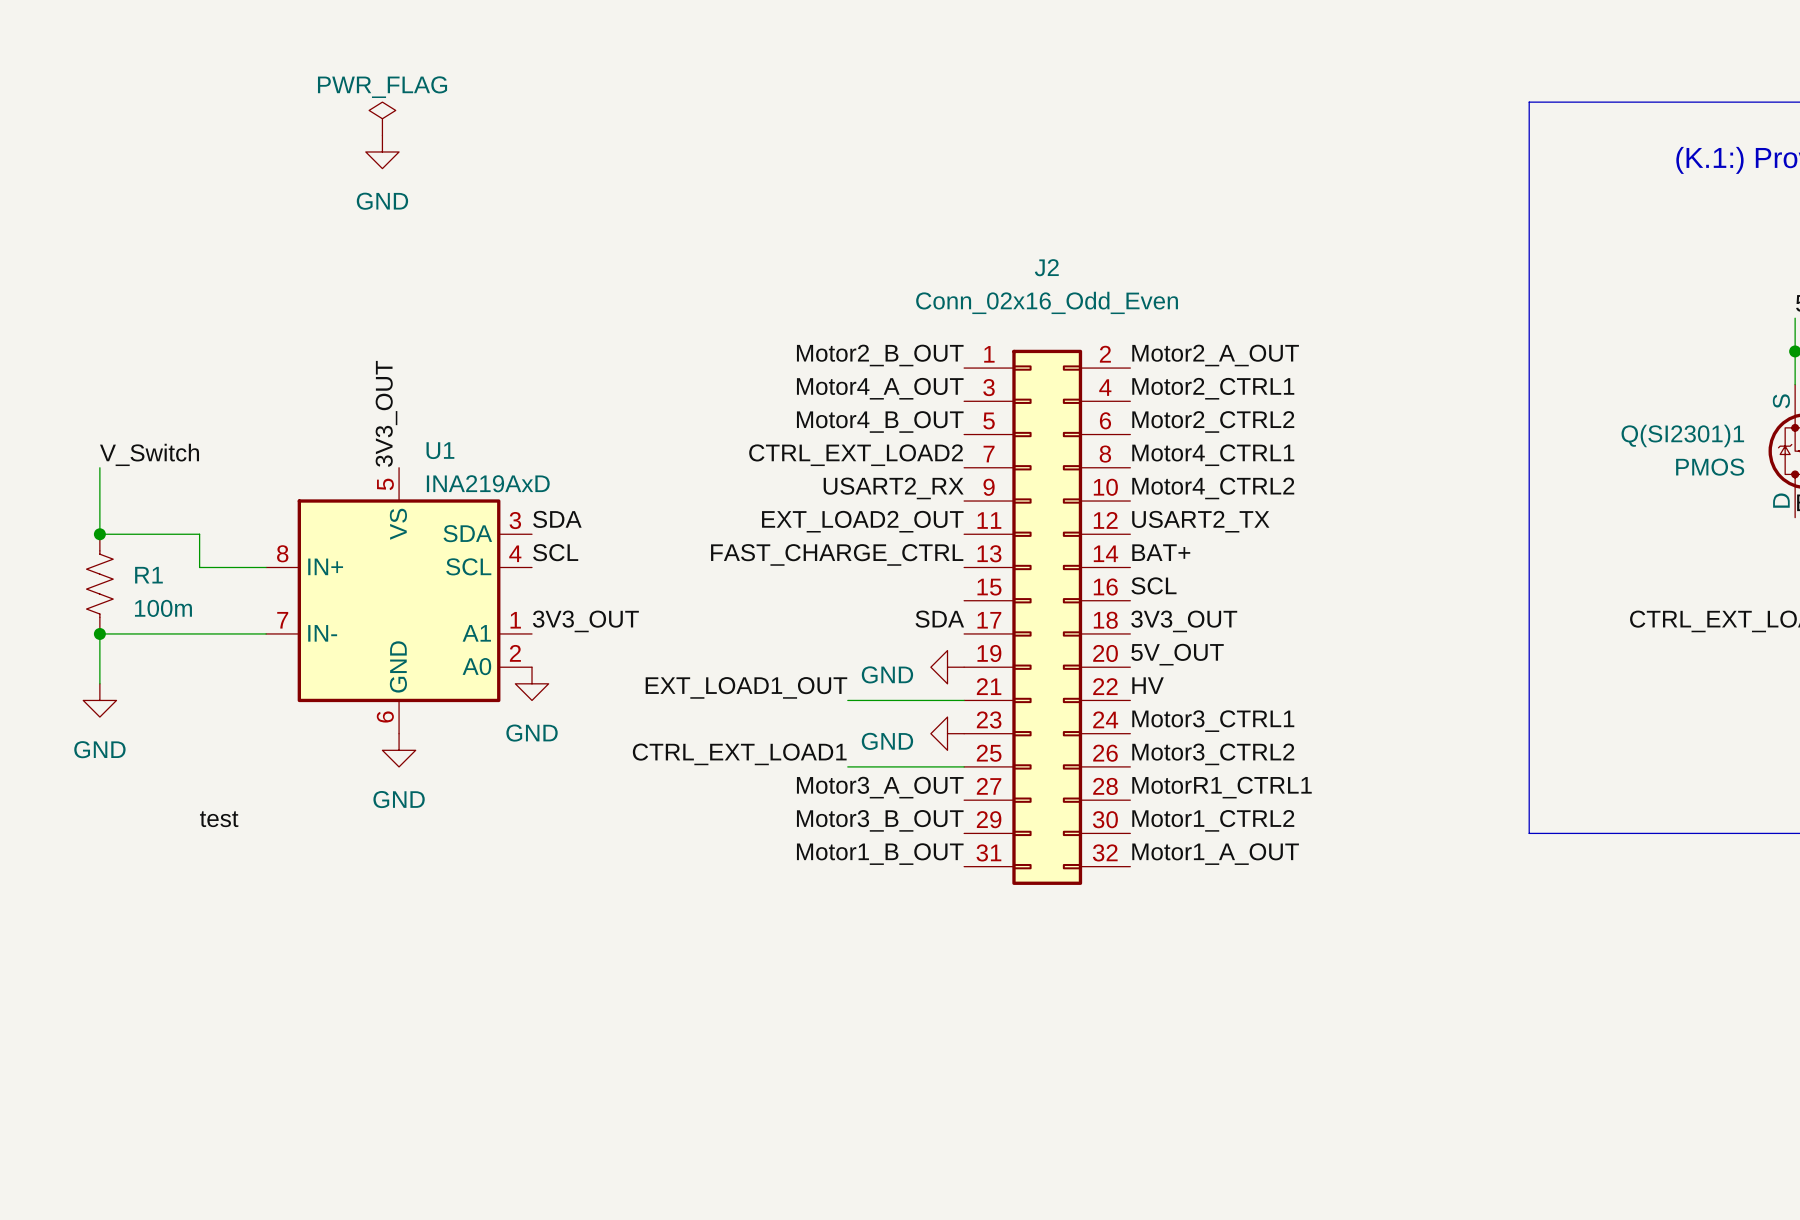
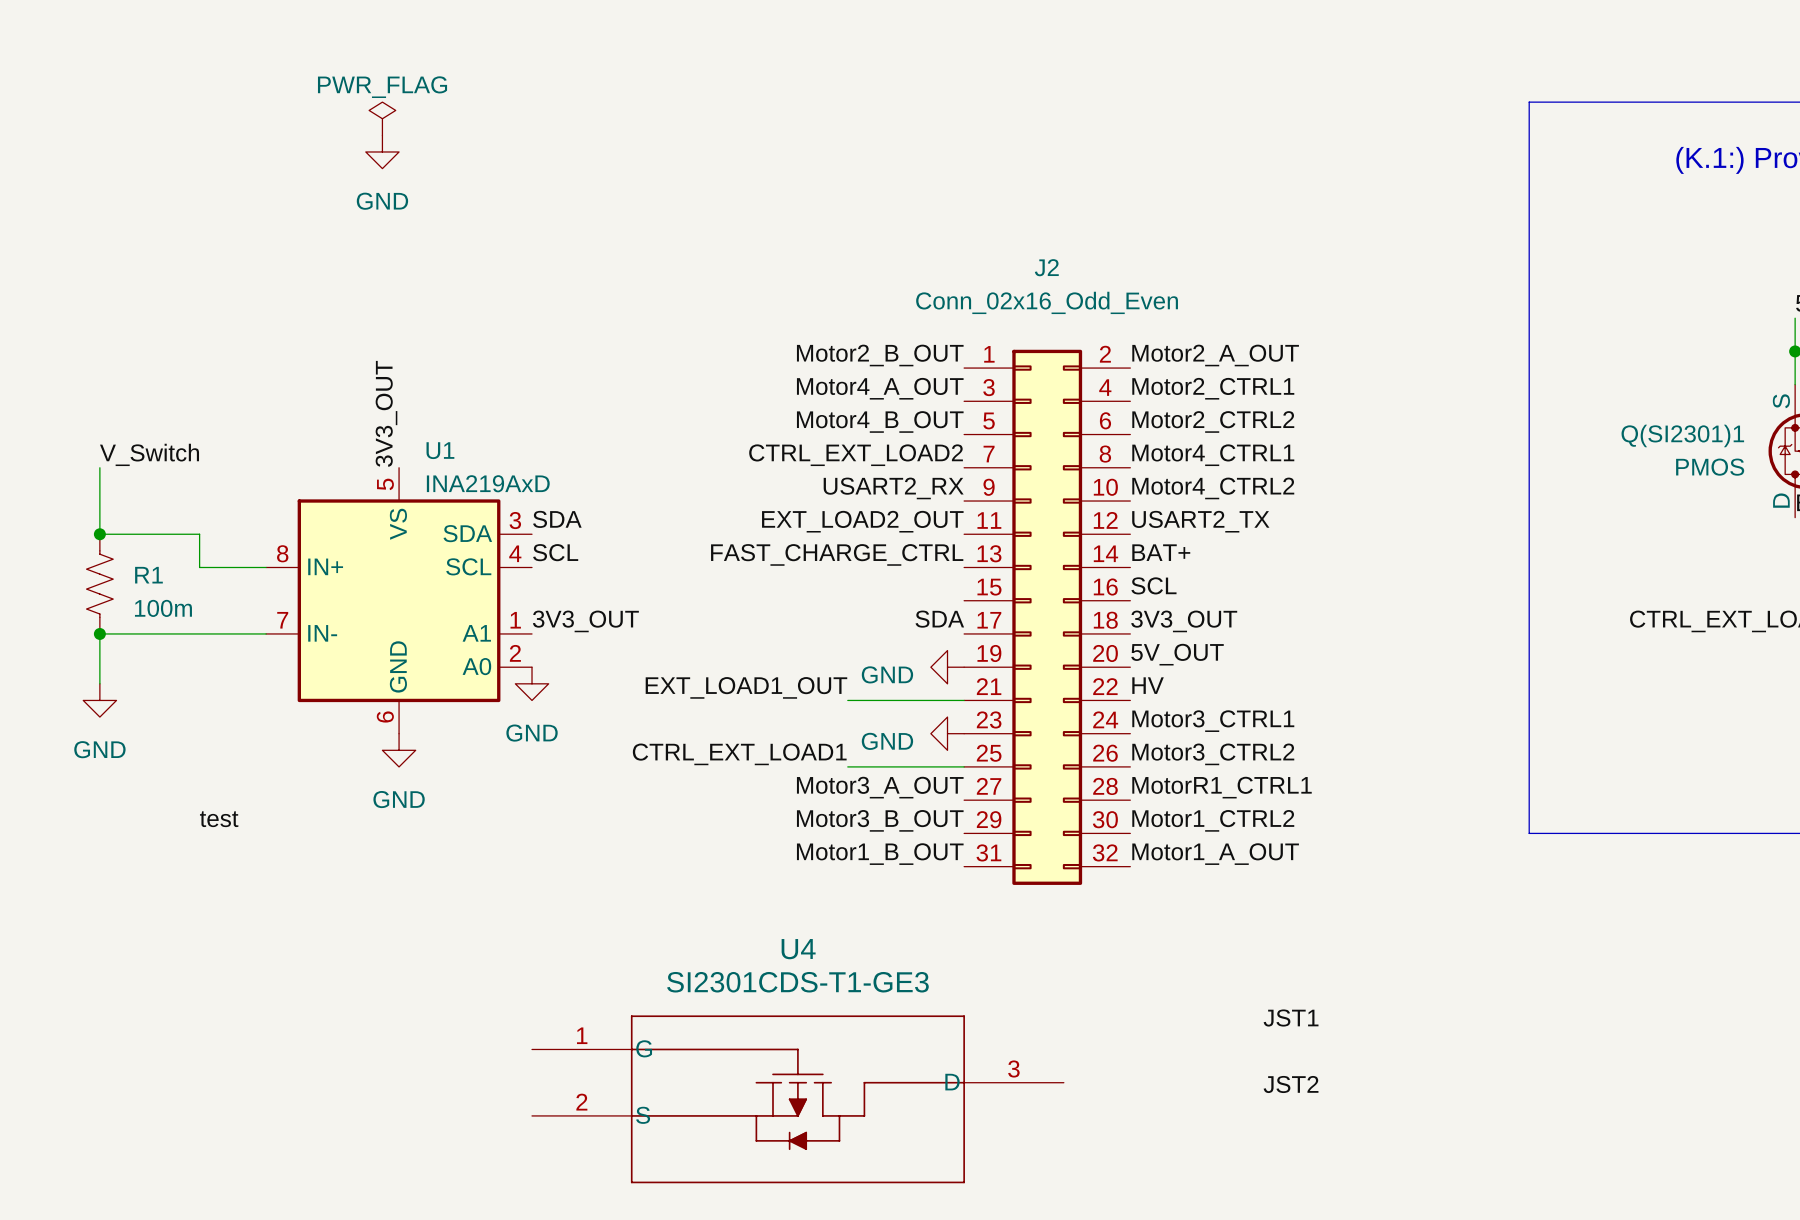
label: none -> JST1 (1291, 1018)
label: none -> JST2 (1291, 1084)
U4: none -> SI2301CDS-T1-GE3 (797, 1099)

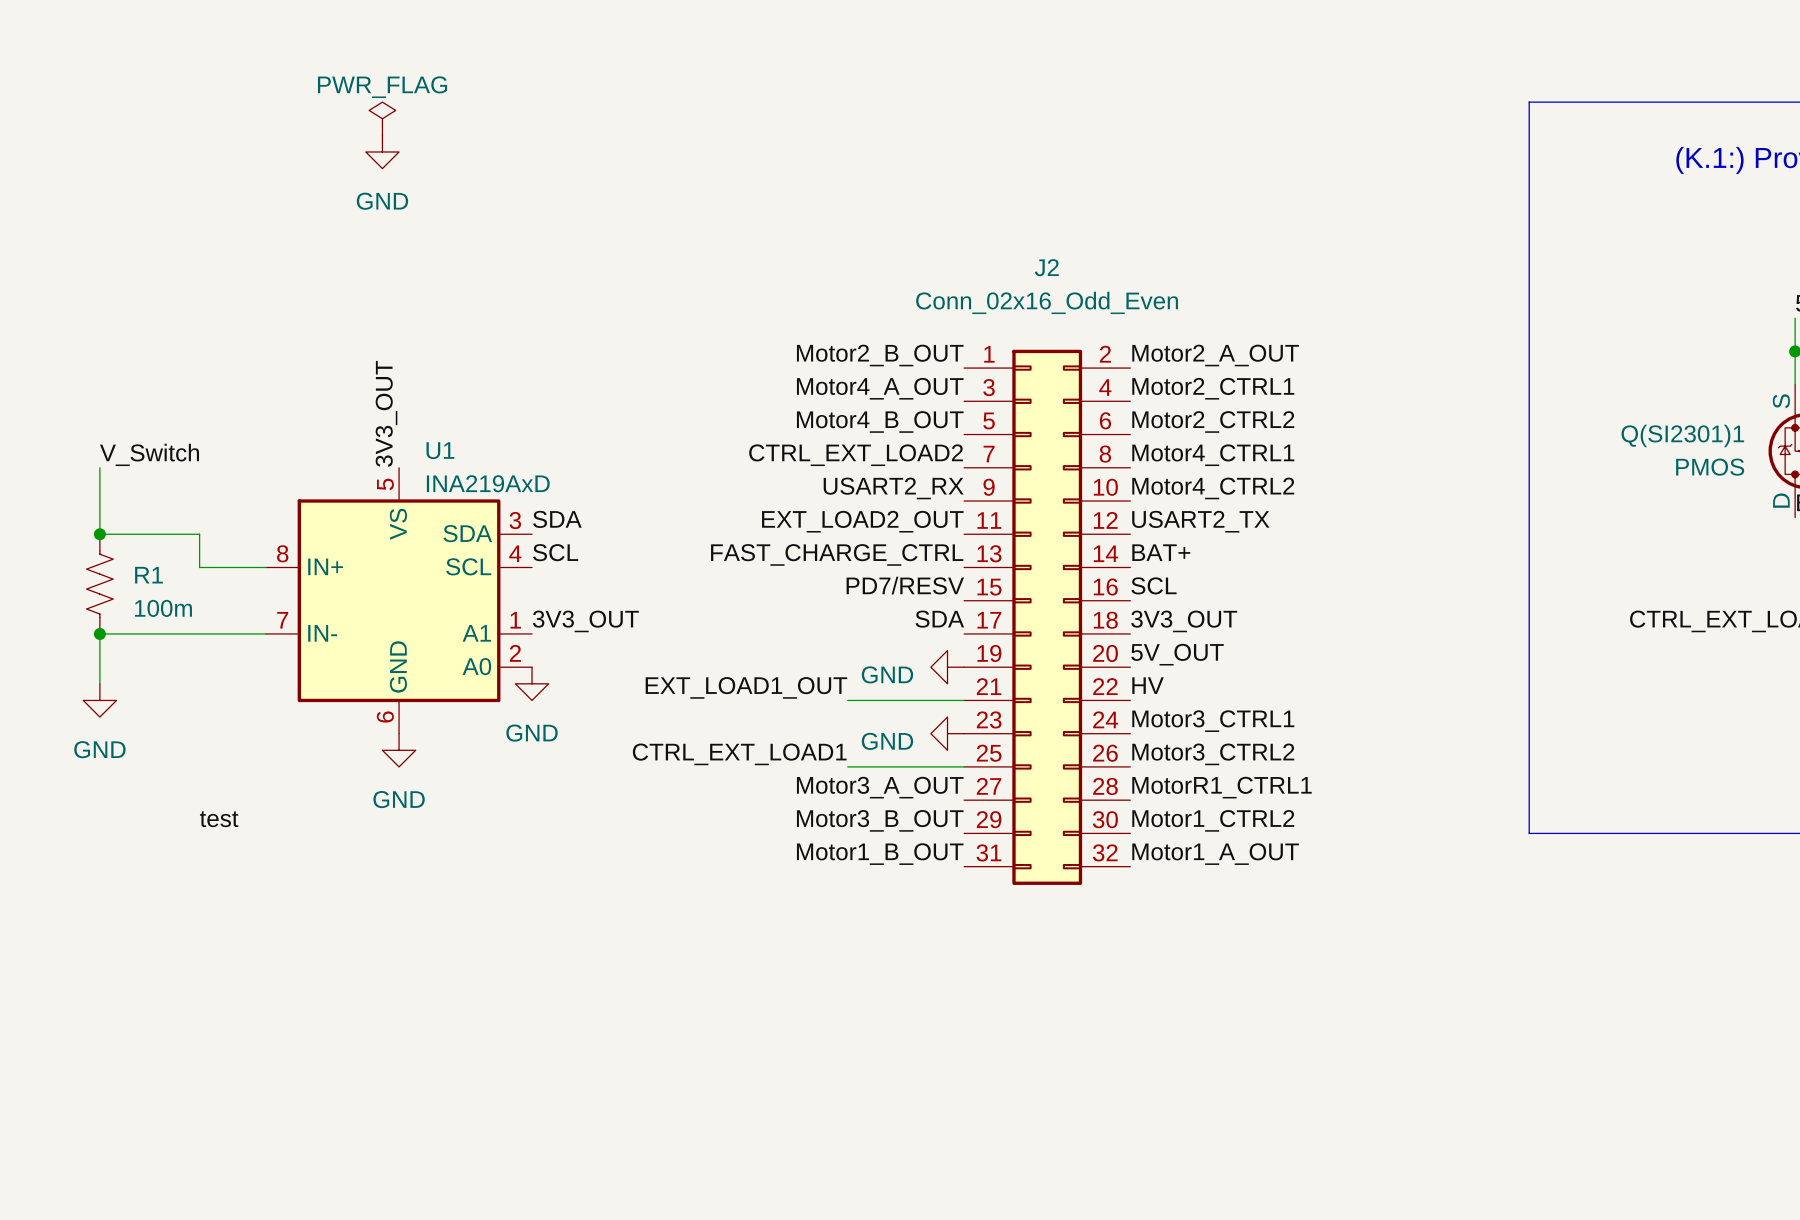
label: none -> PD7/RESV (905, 585)
label: JST1 (1291, 1018) -> none
label: JST2 (1291, 1084) -> none
U4: SI2301CDS-T1-GE3 (797, 1099) -> none

